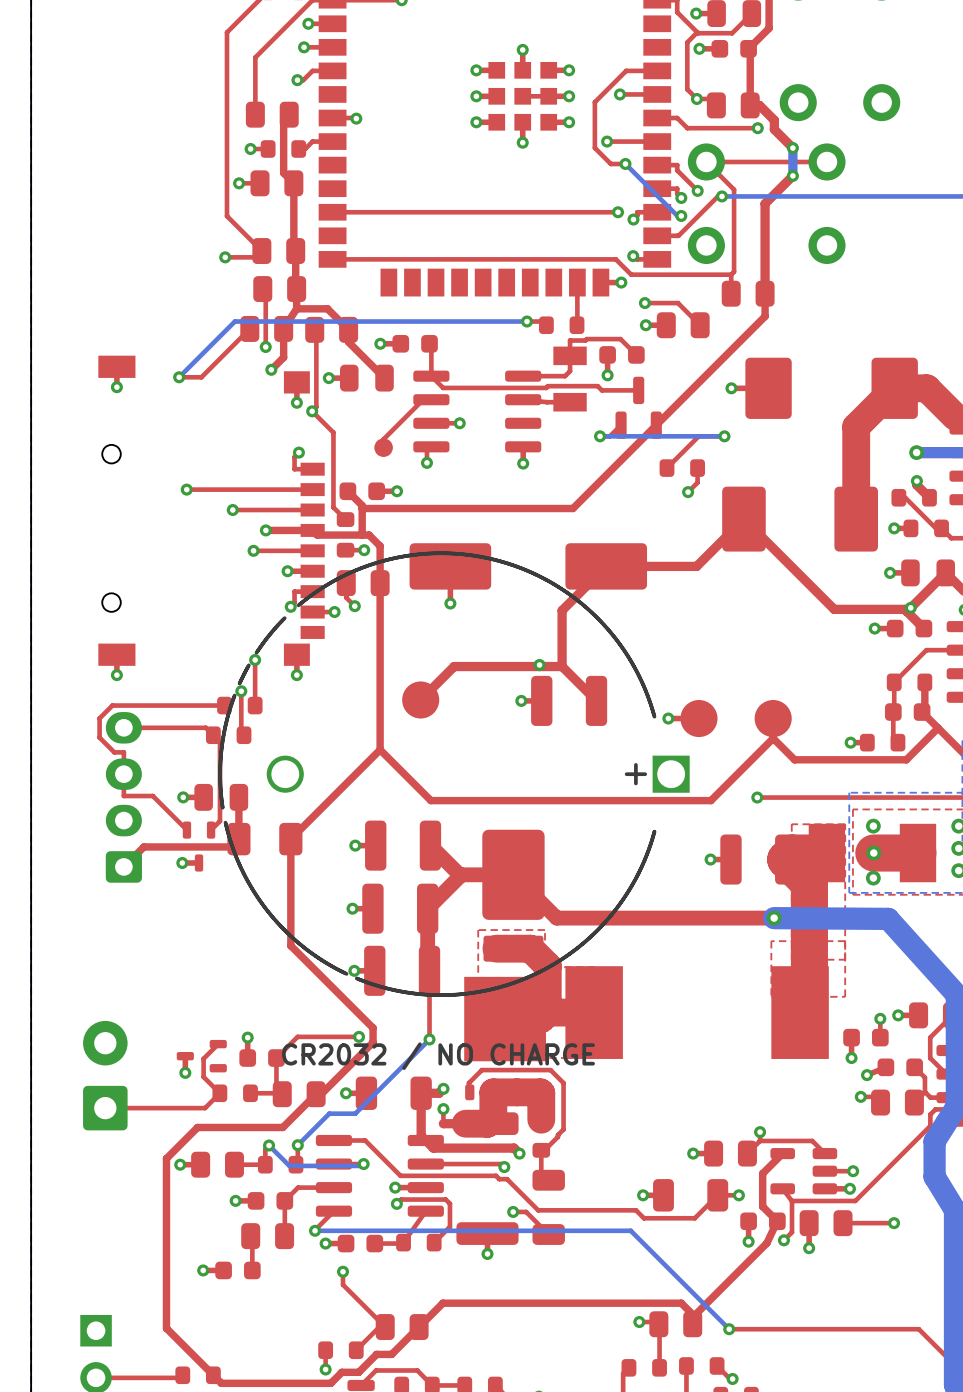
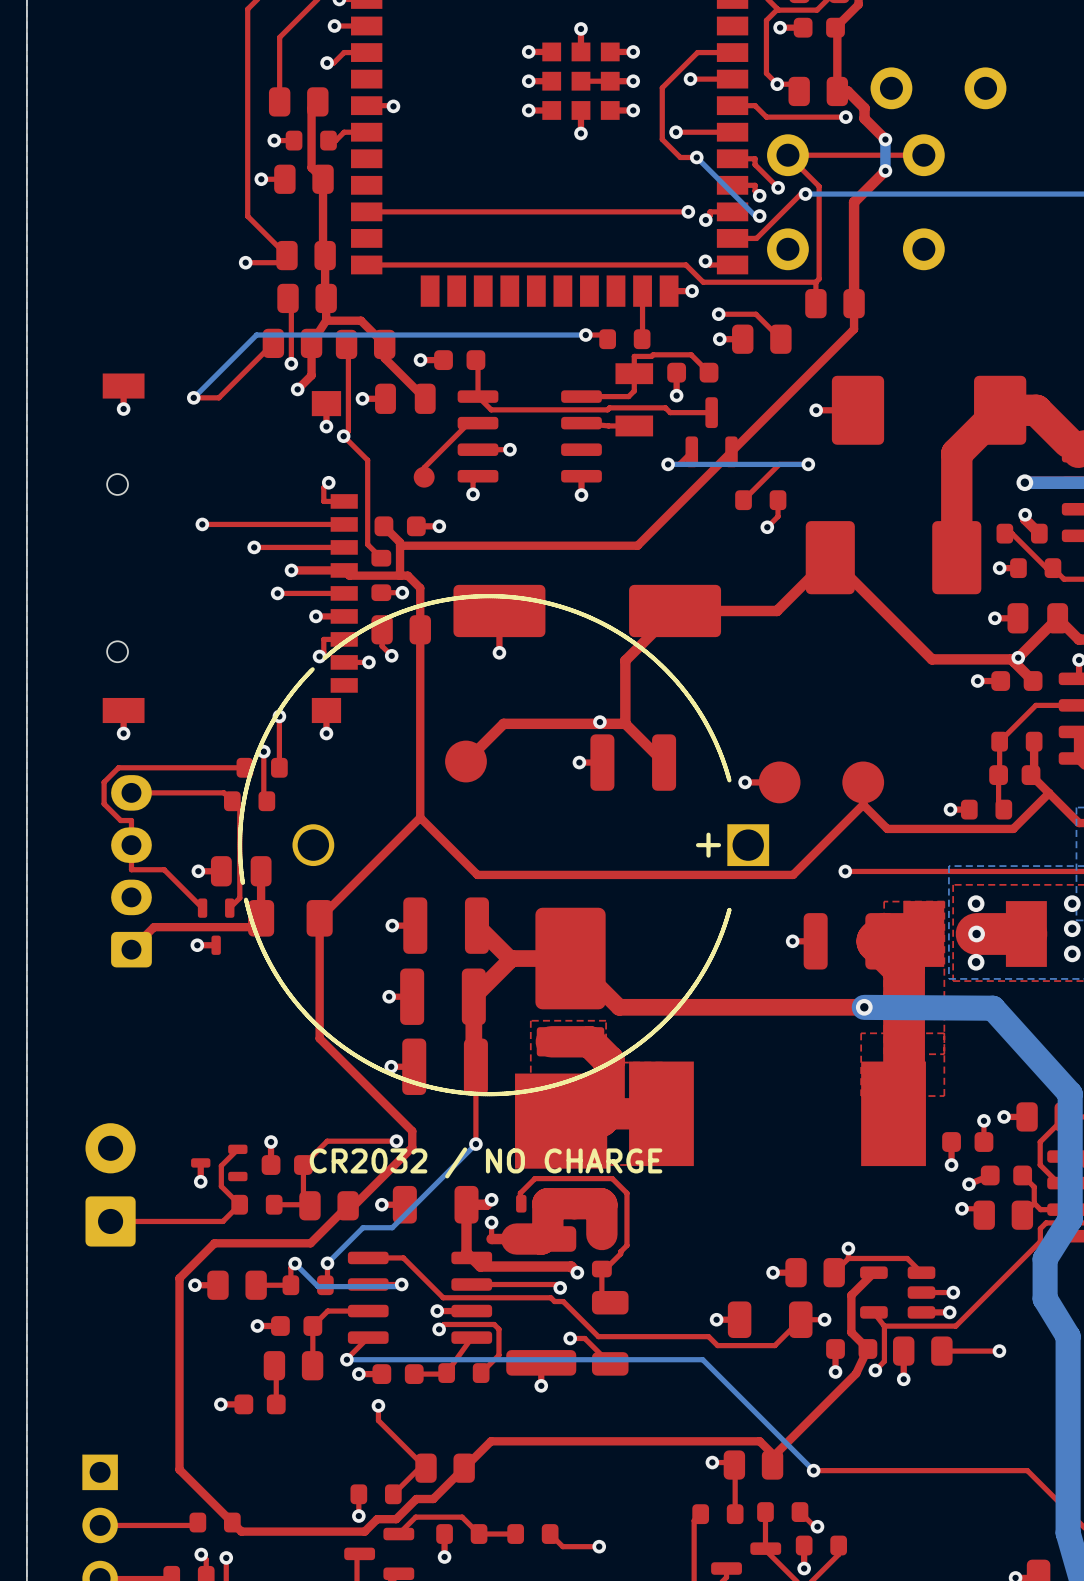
part footprint: [218, 551, 690, 998] -> [237, 594, 770, 1097]

